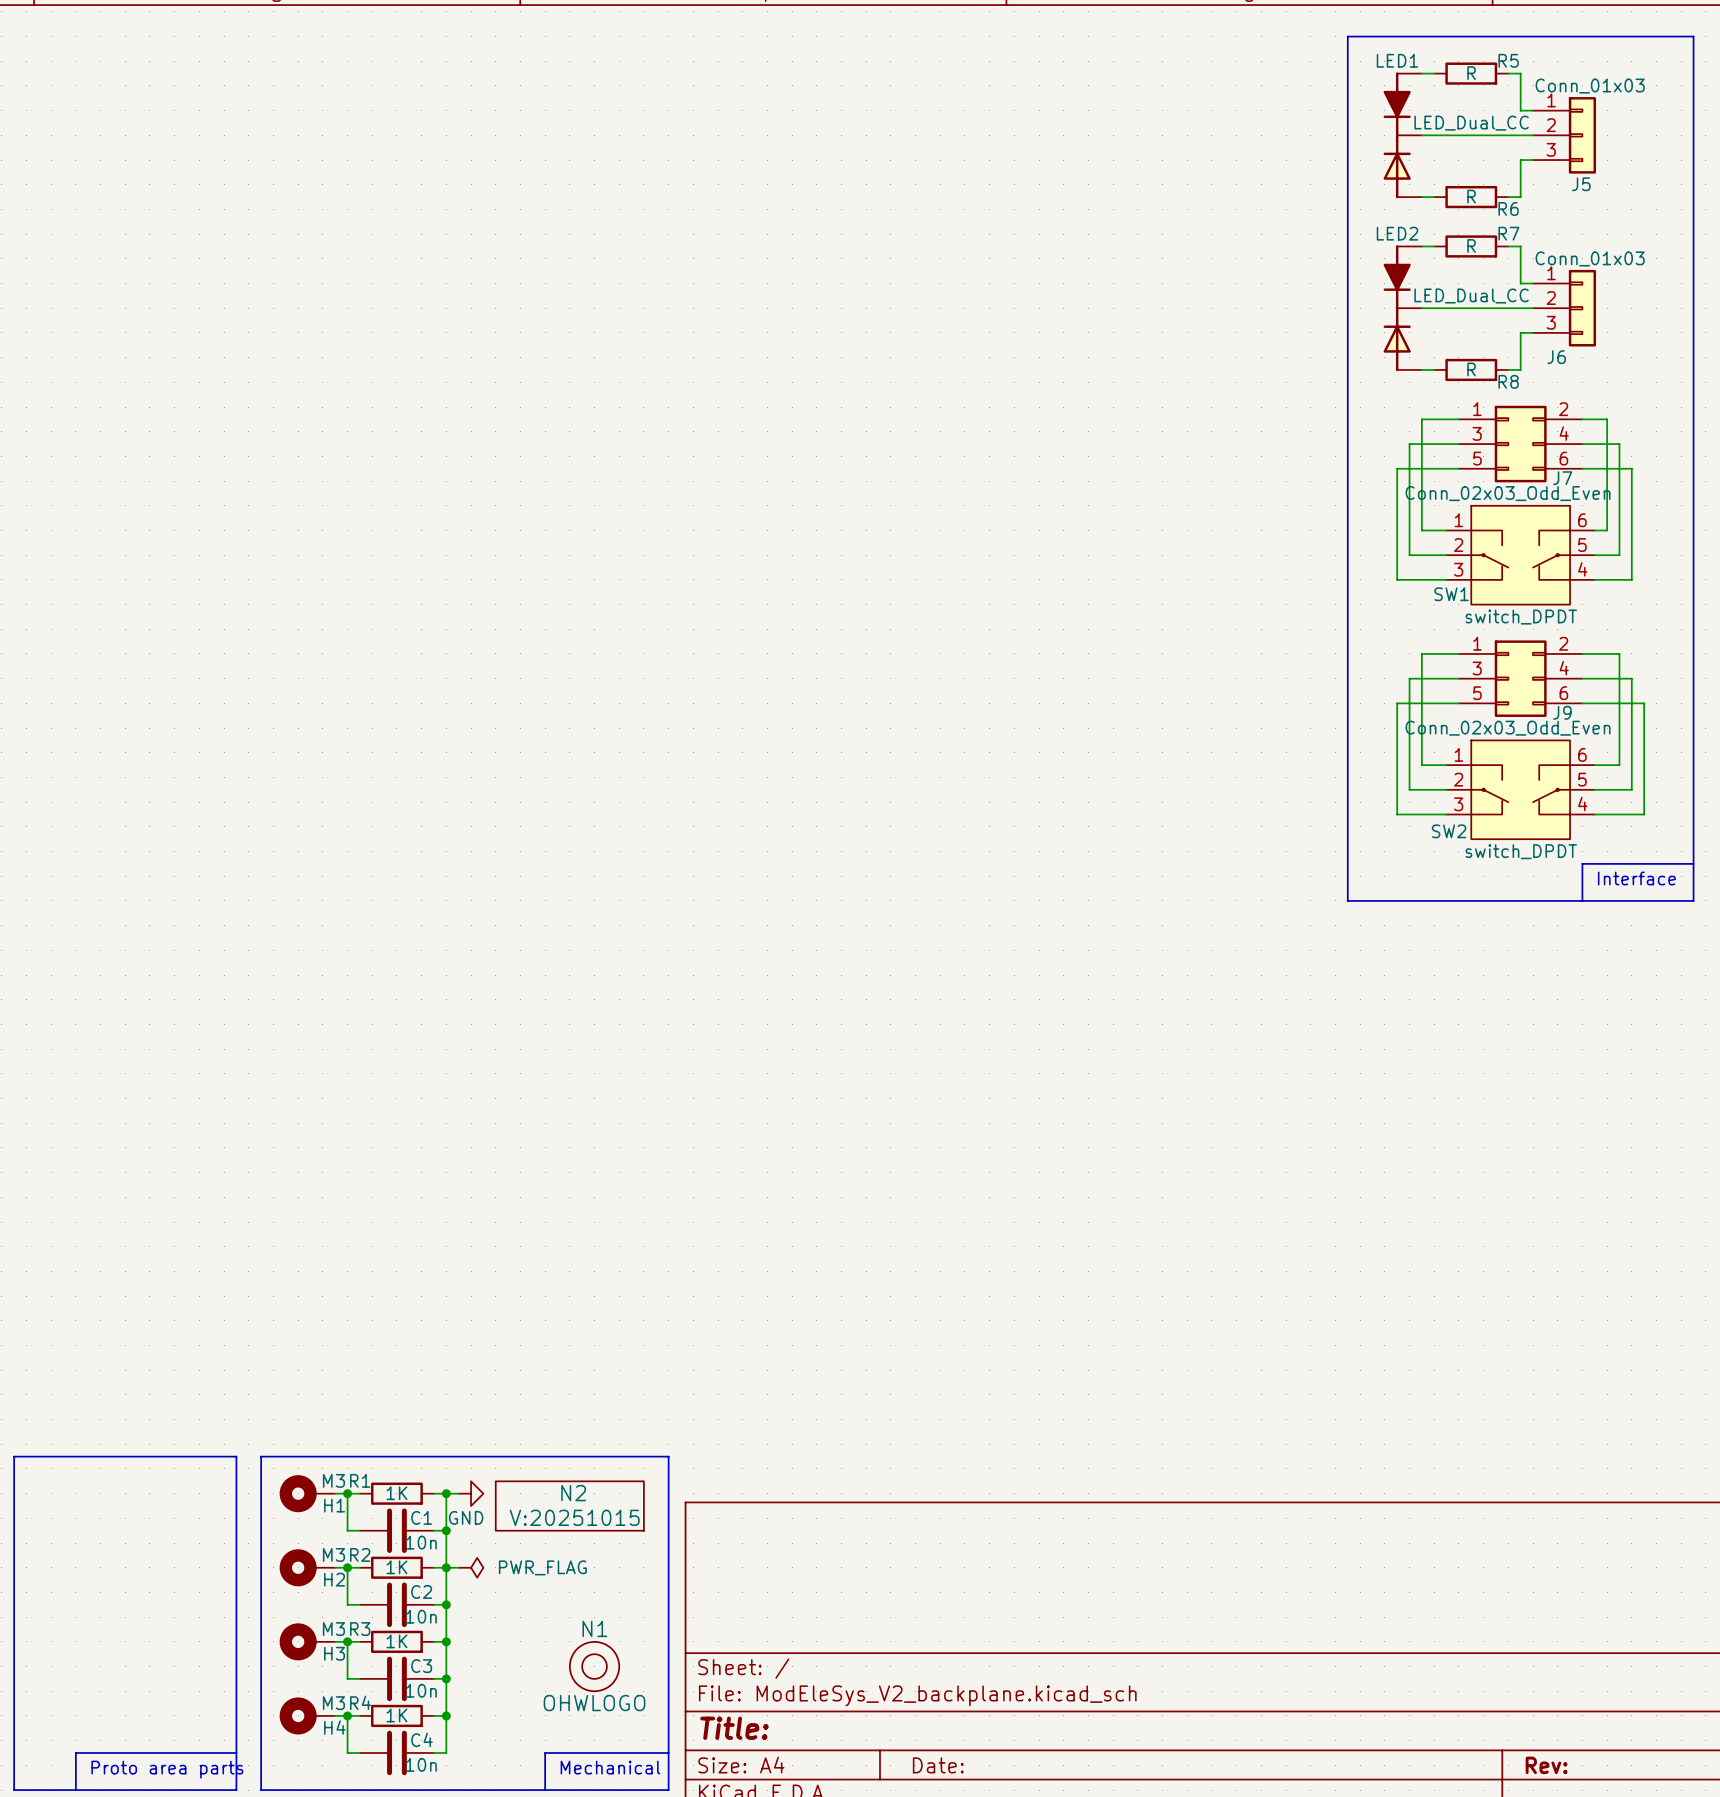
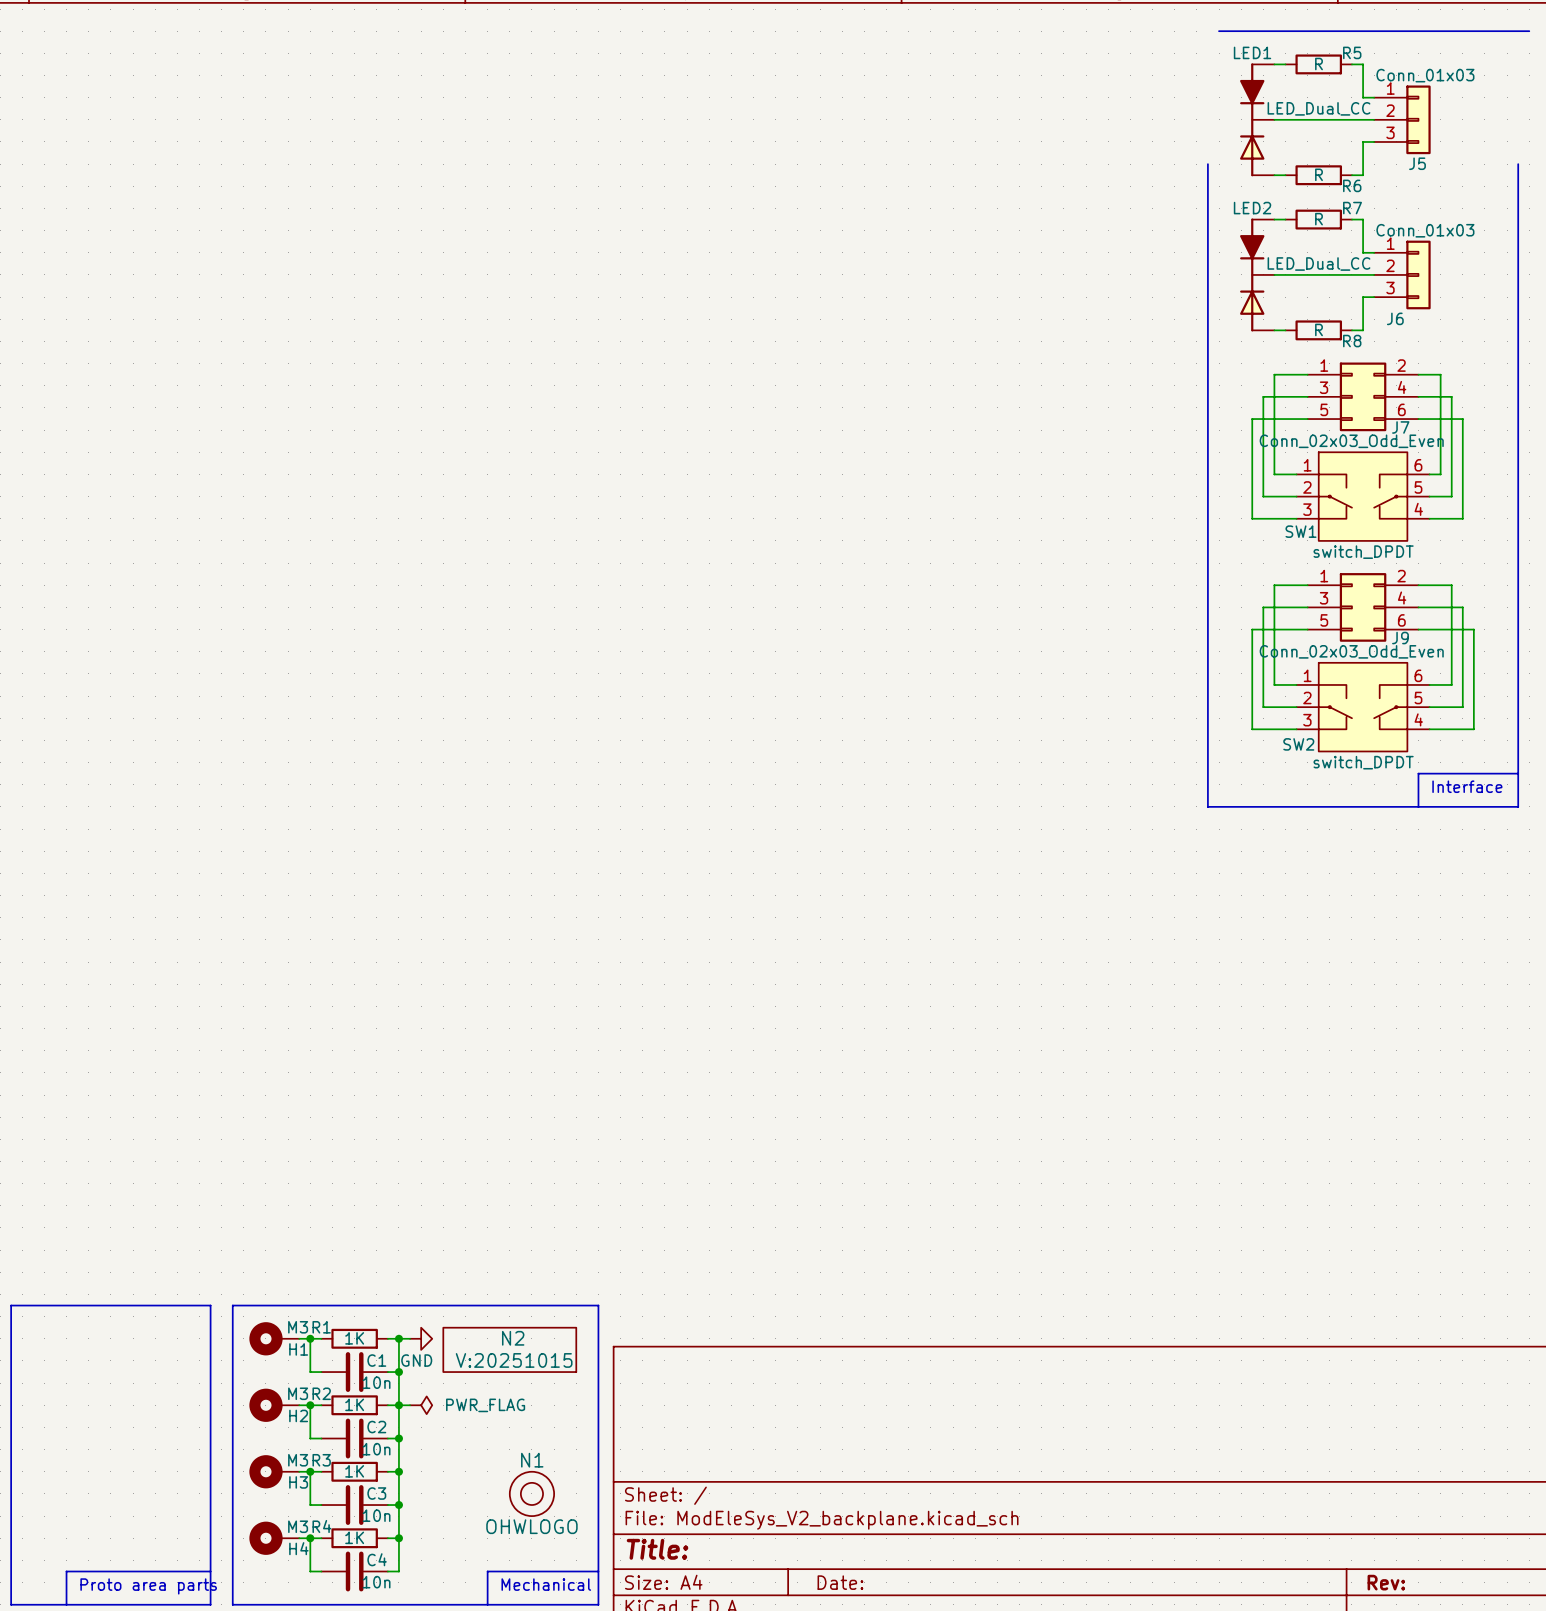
line: (1360, 36) (1347, 36) (1347, 184) -> none
line: (1693, 36) (1693, 184) -> (1518, 31) (1529, 31)

